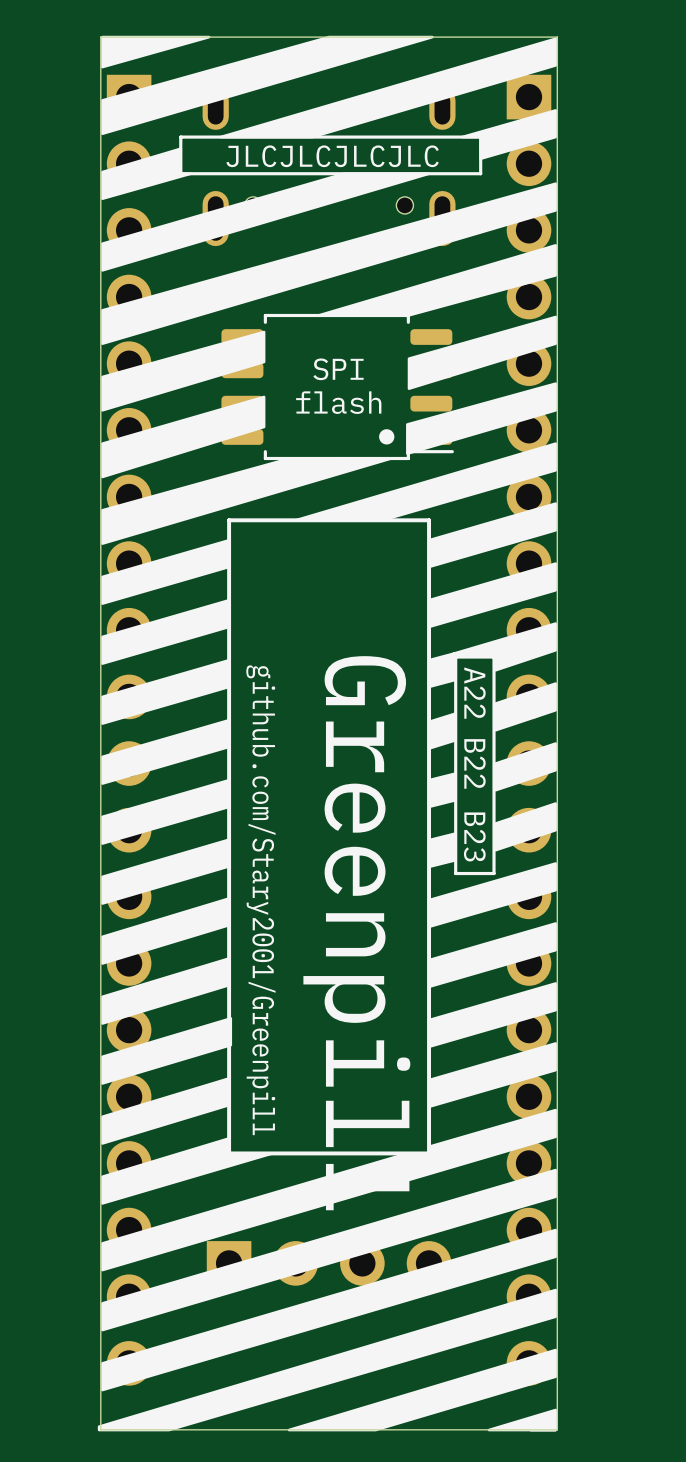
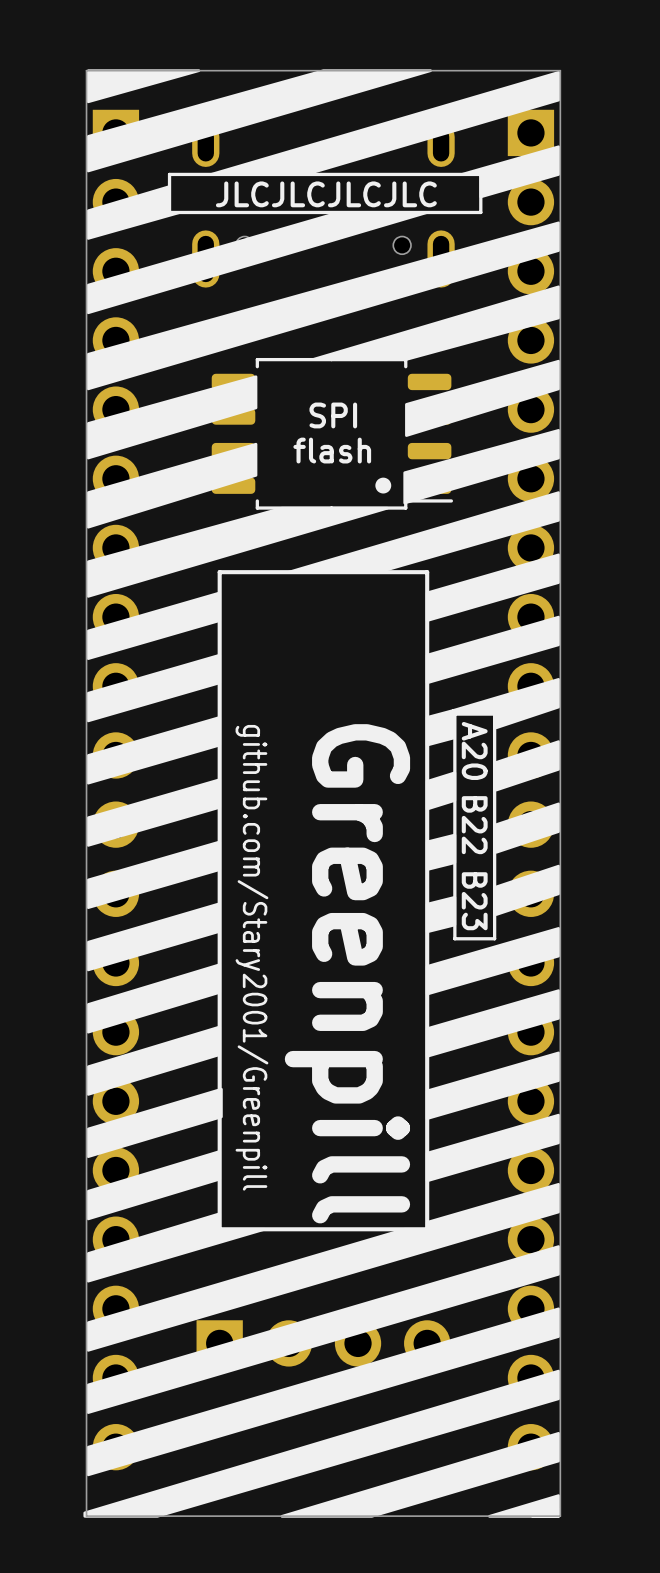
text: A22 (474, 693) -> A20 (474, 750)

